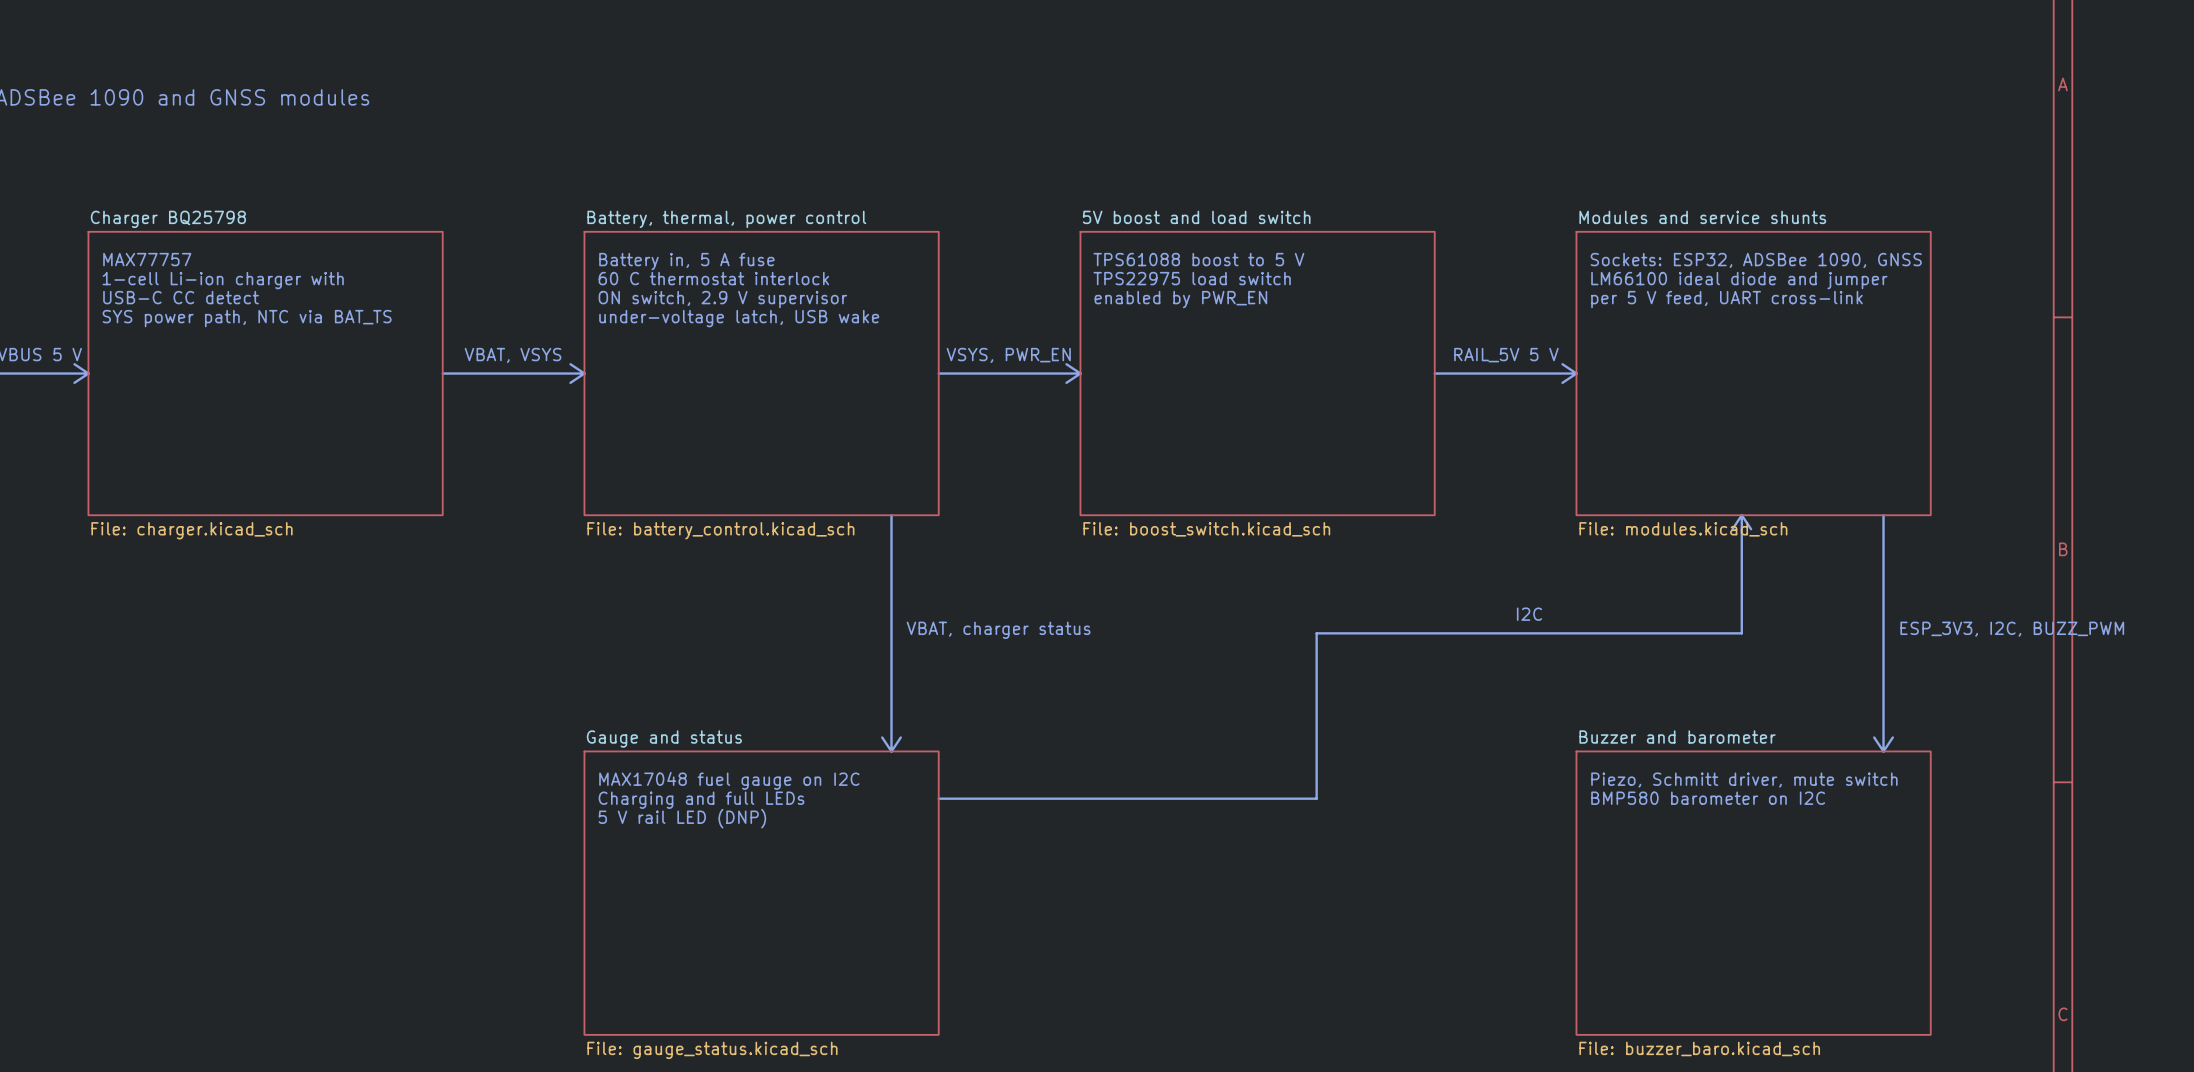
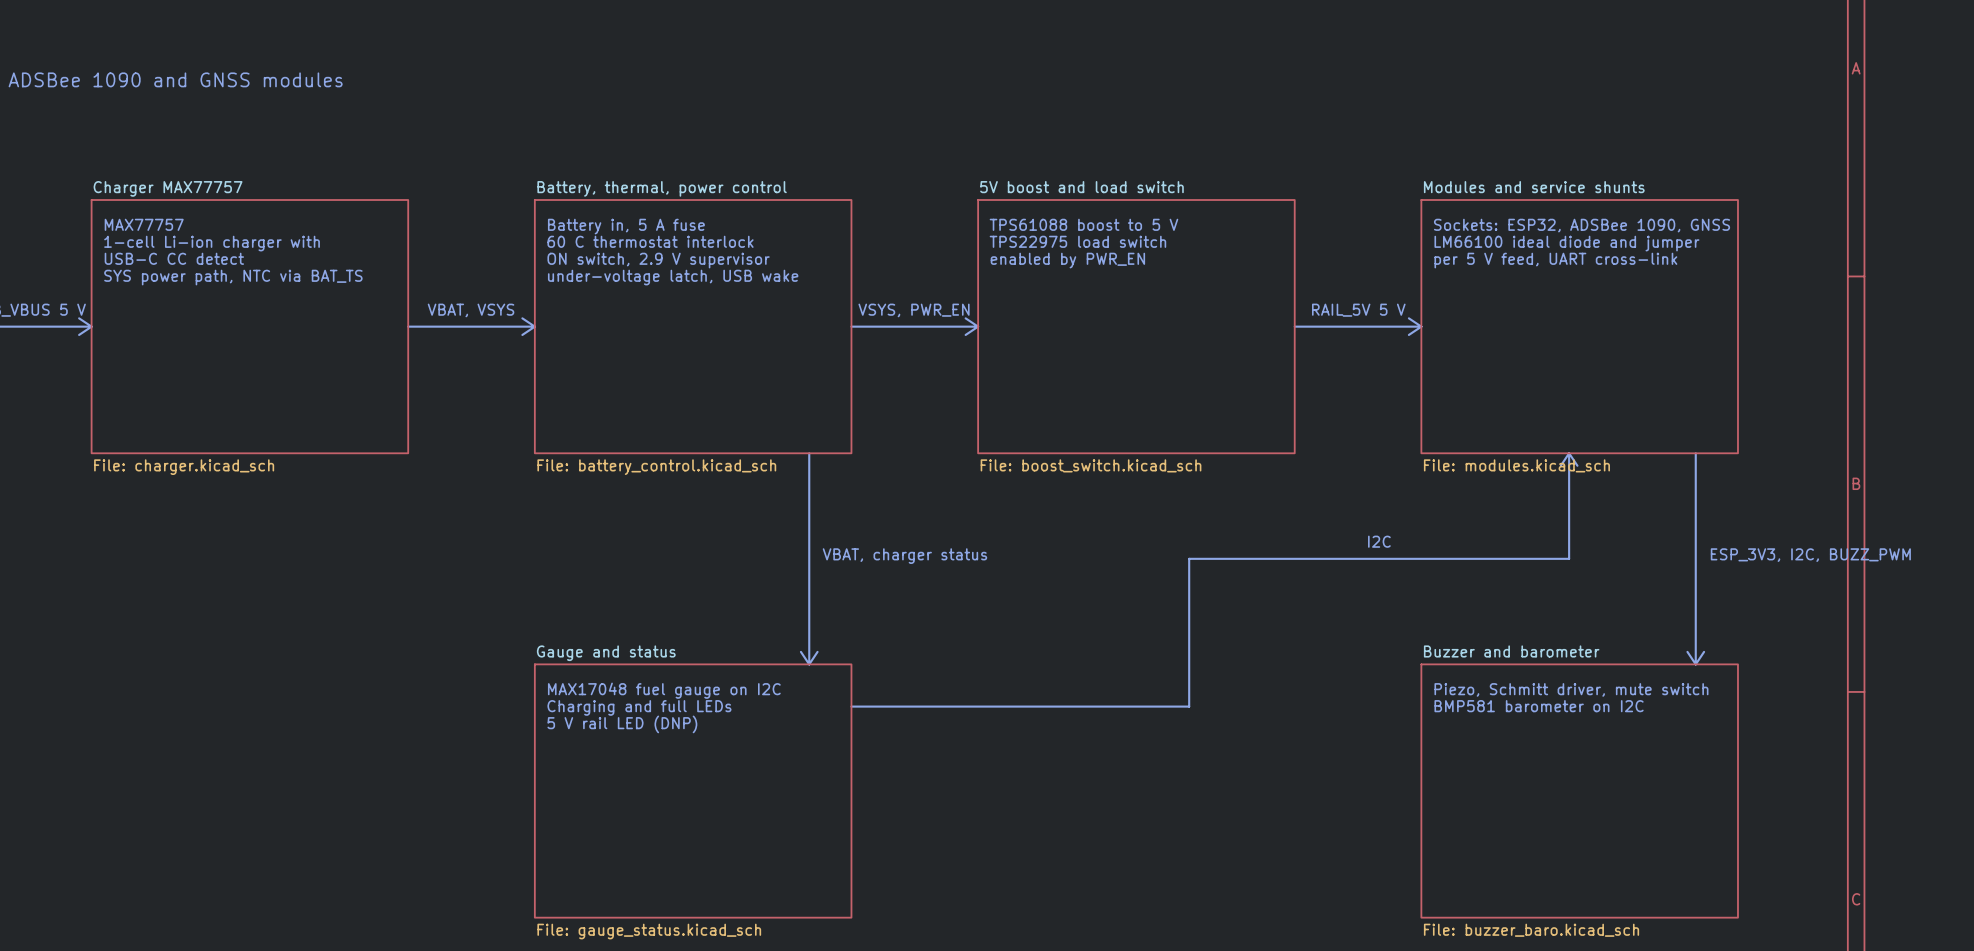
sheet Charger BQ25798 name: Charger BQ25798 (168, 219) -> Charger MAX77757 (168, 188)
text: BMP580 barometer on I2C (1708, 798) -> BMP581 barometer on I2C (1539, 706)

